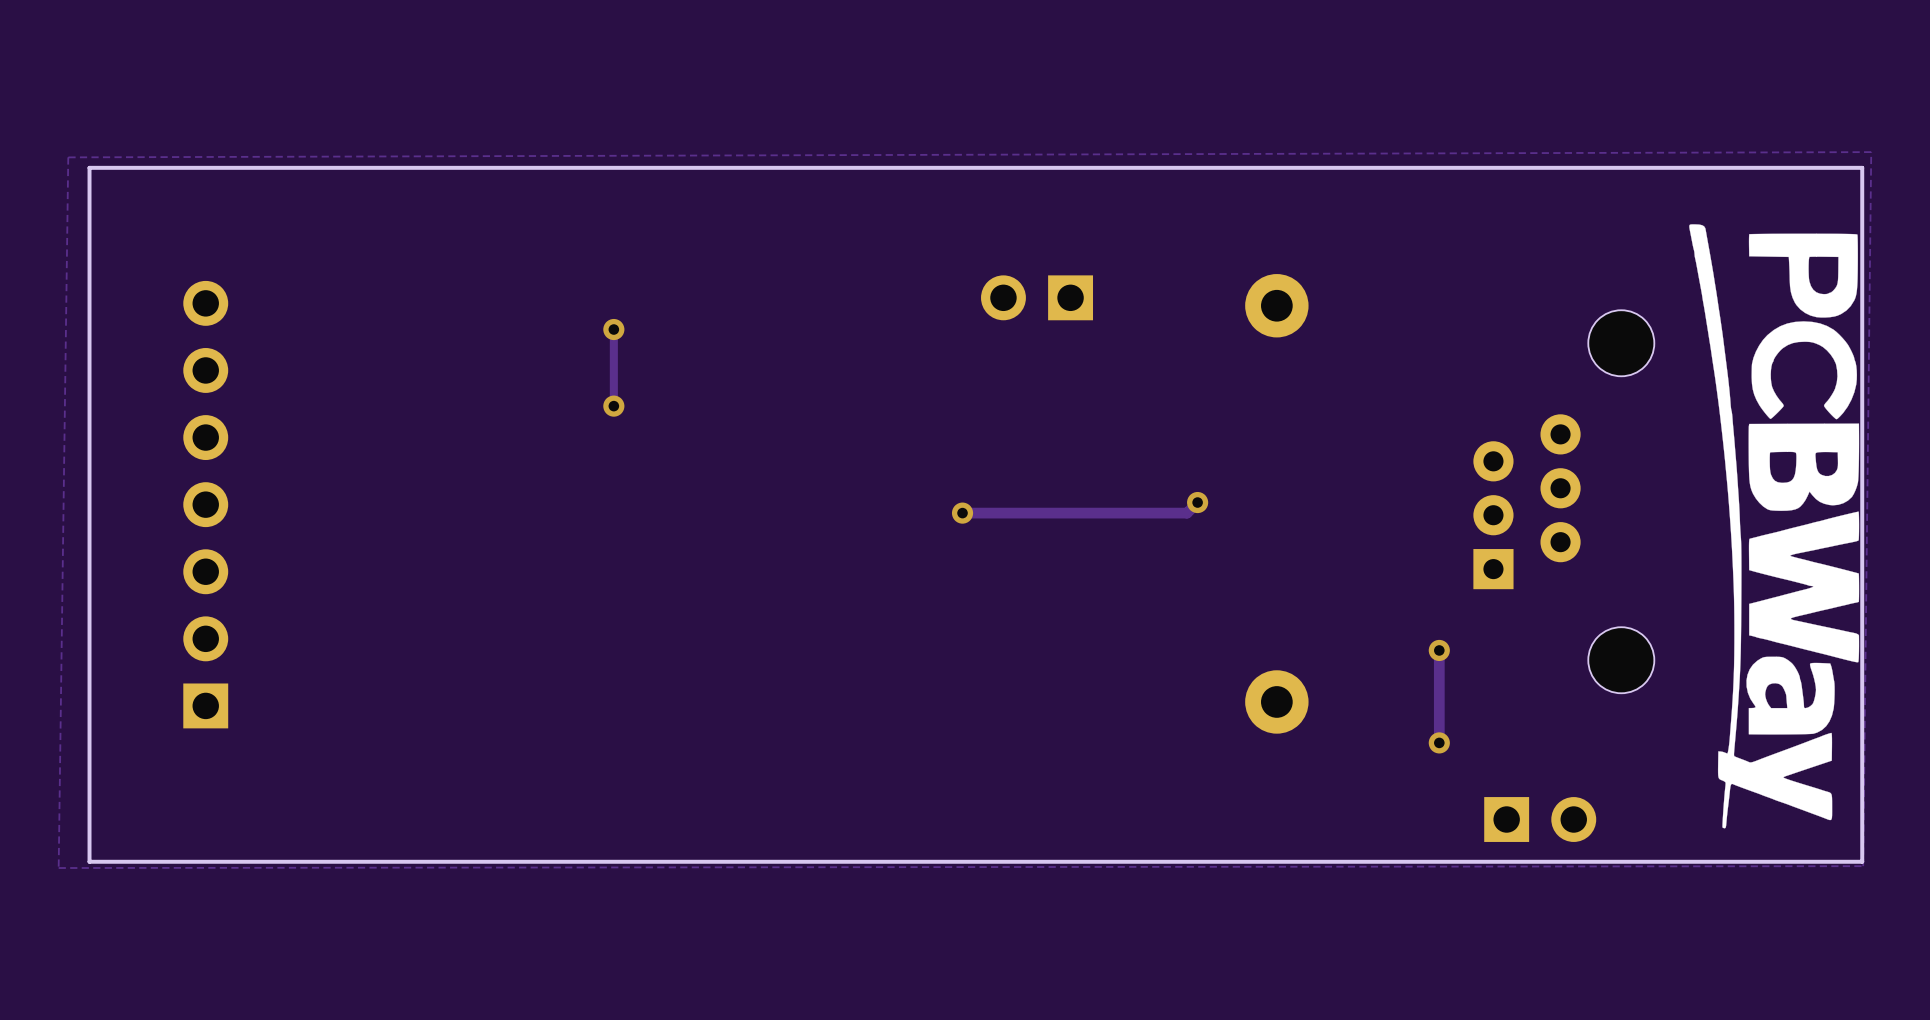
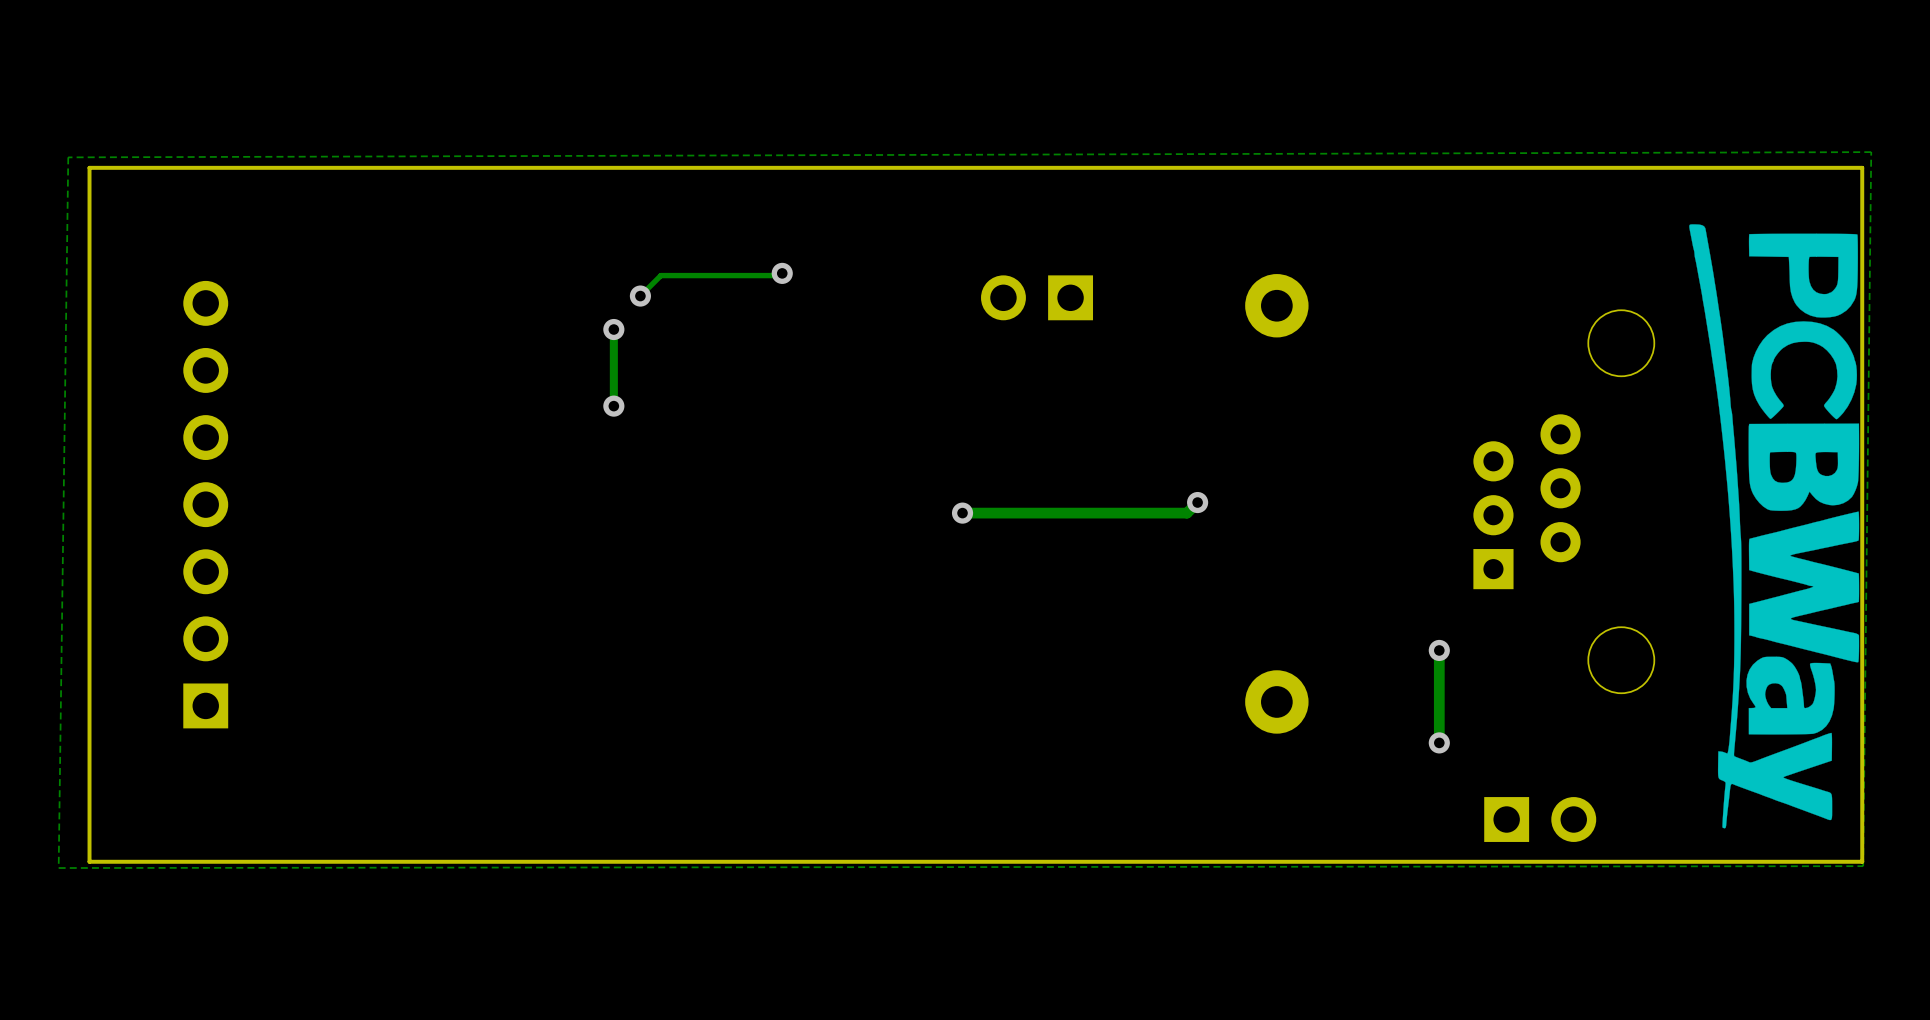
track: none -> (782, 273) (780, 275) (660, 275) (640, 296)
via: none -> (782, 273)
via: none -> (640, 296)

